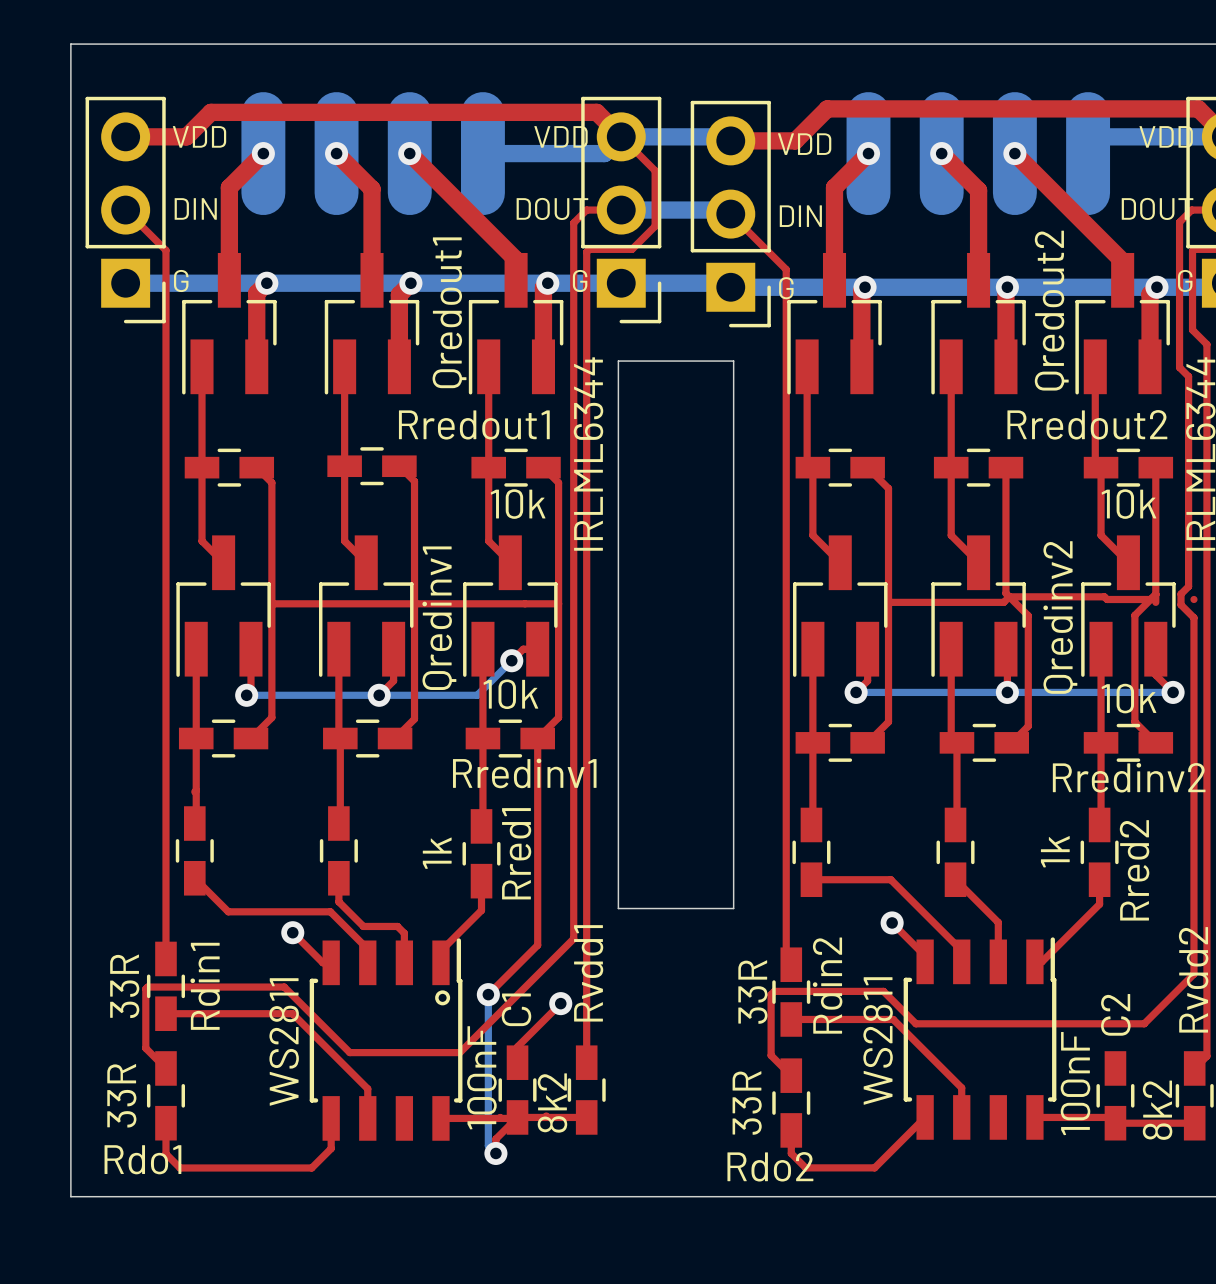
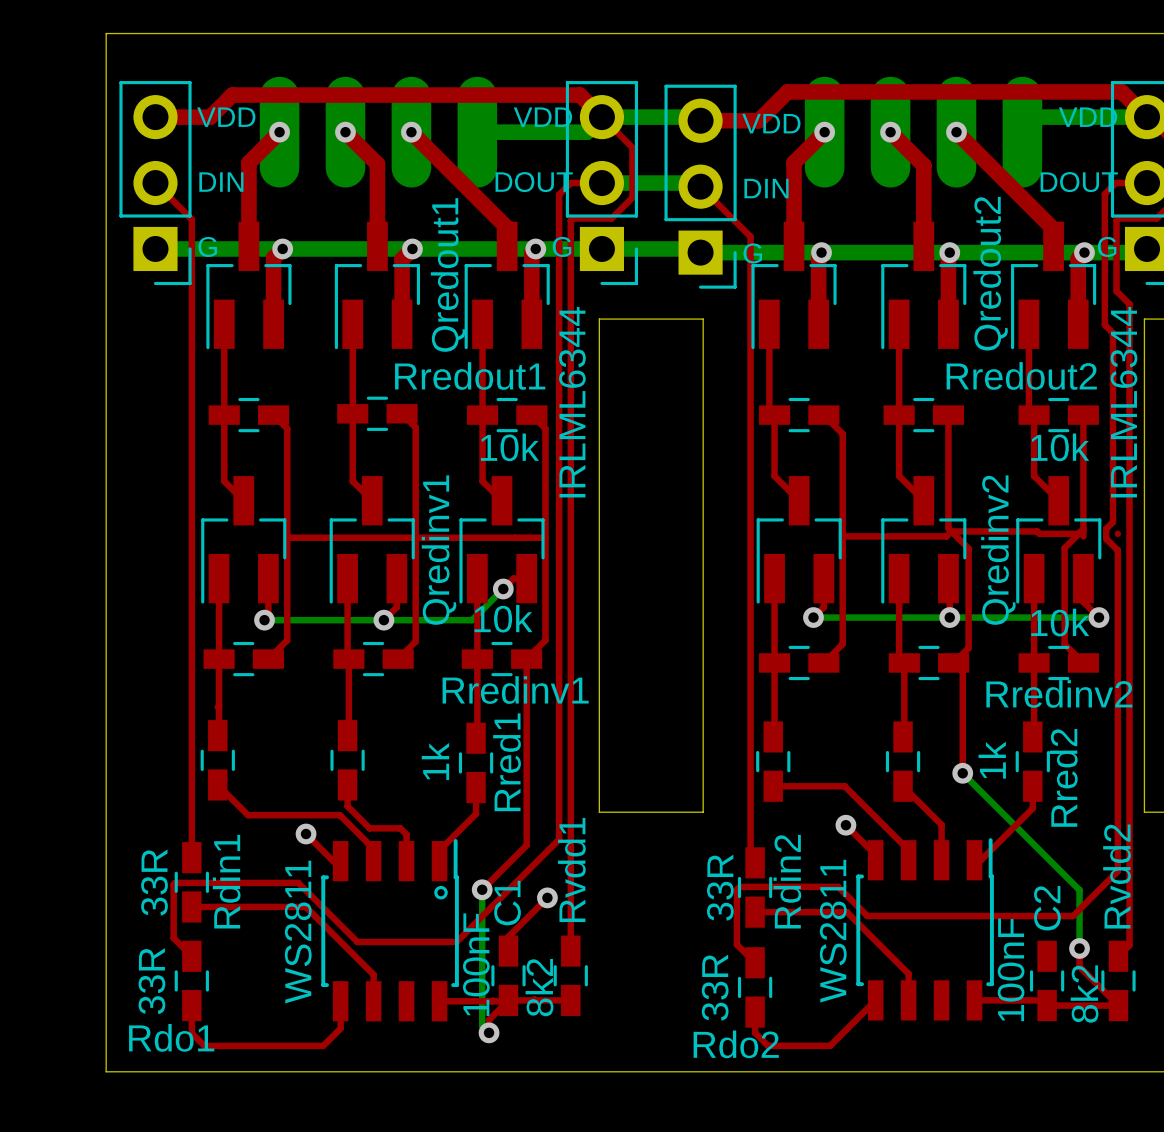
top track: none -> (953, 662) (962, 672) (962, 773)
bottom track: none -> (962, 773) (1079, 890) (1079, 948)
via: none -> (962, 773)
top track: none -> (1079, 948) (1079, 966) (1118, 1005)
via: none -> (1079, 948)

